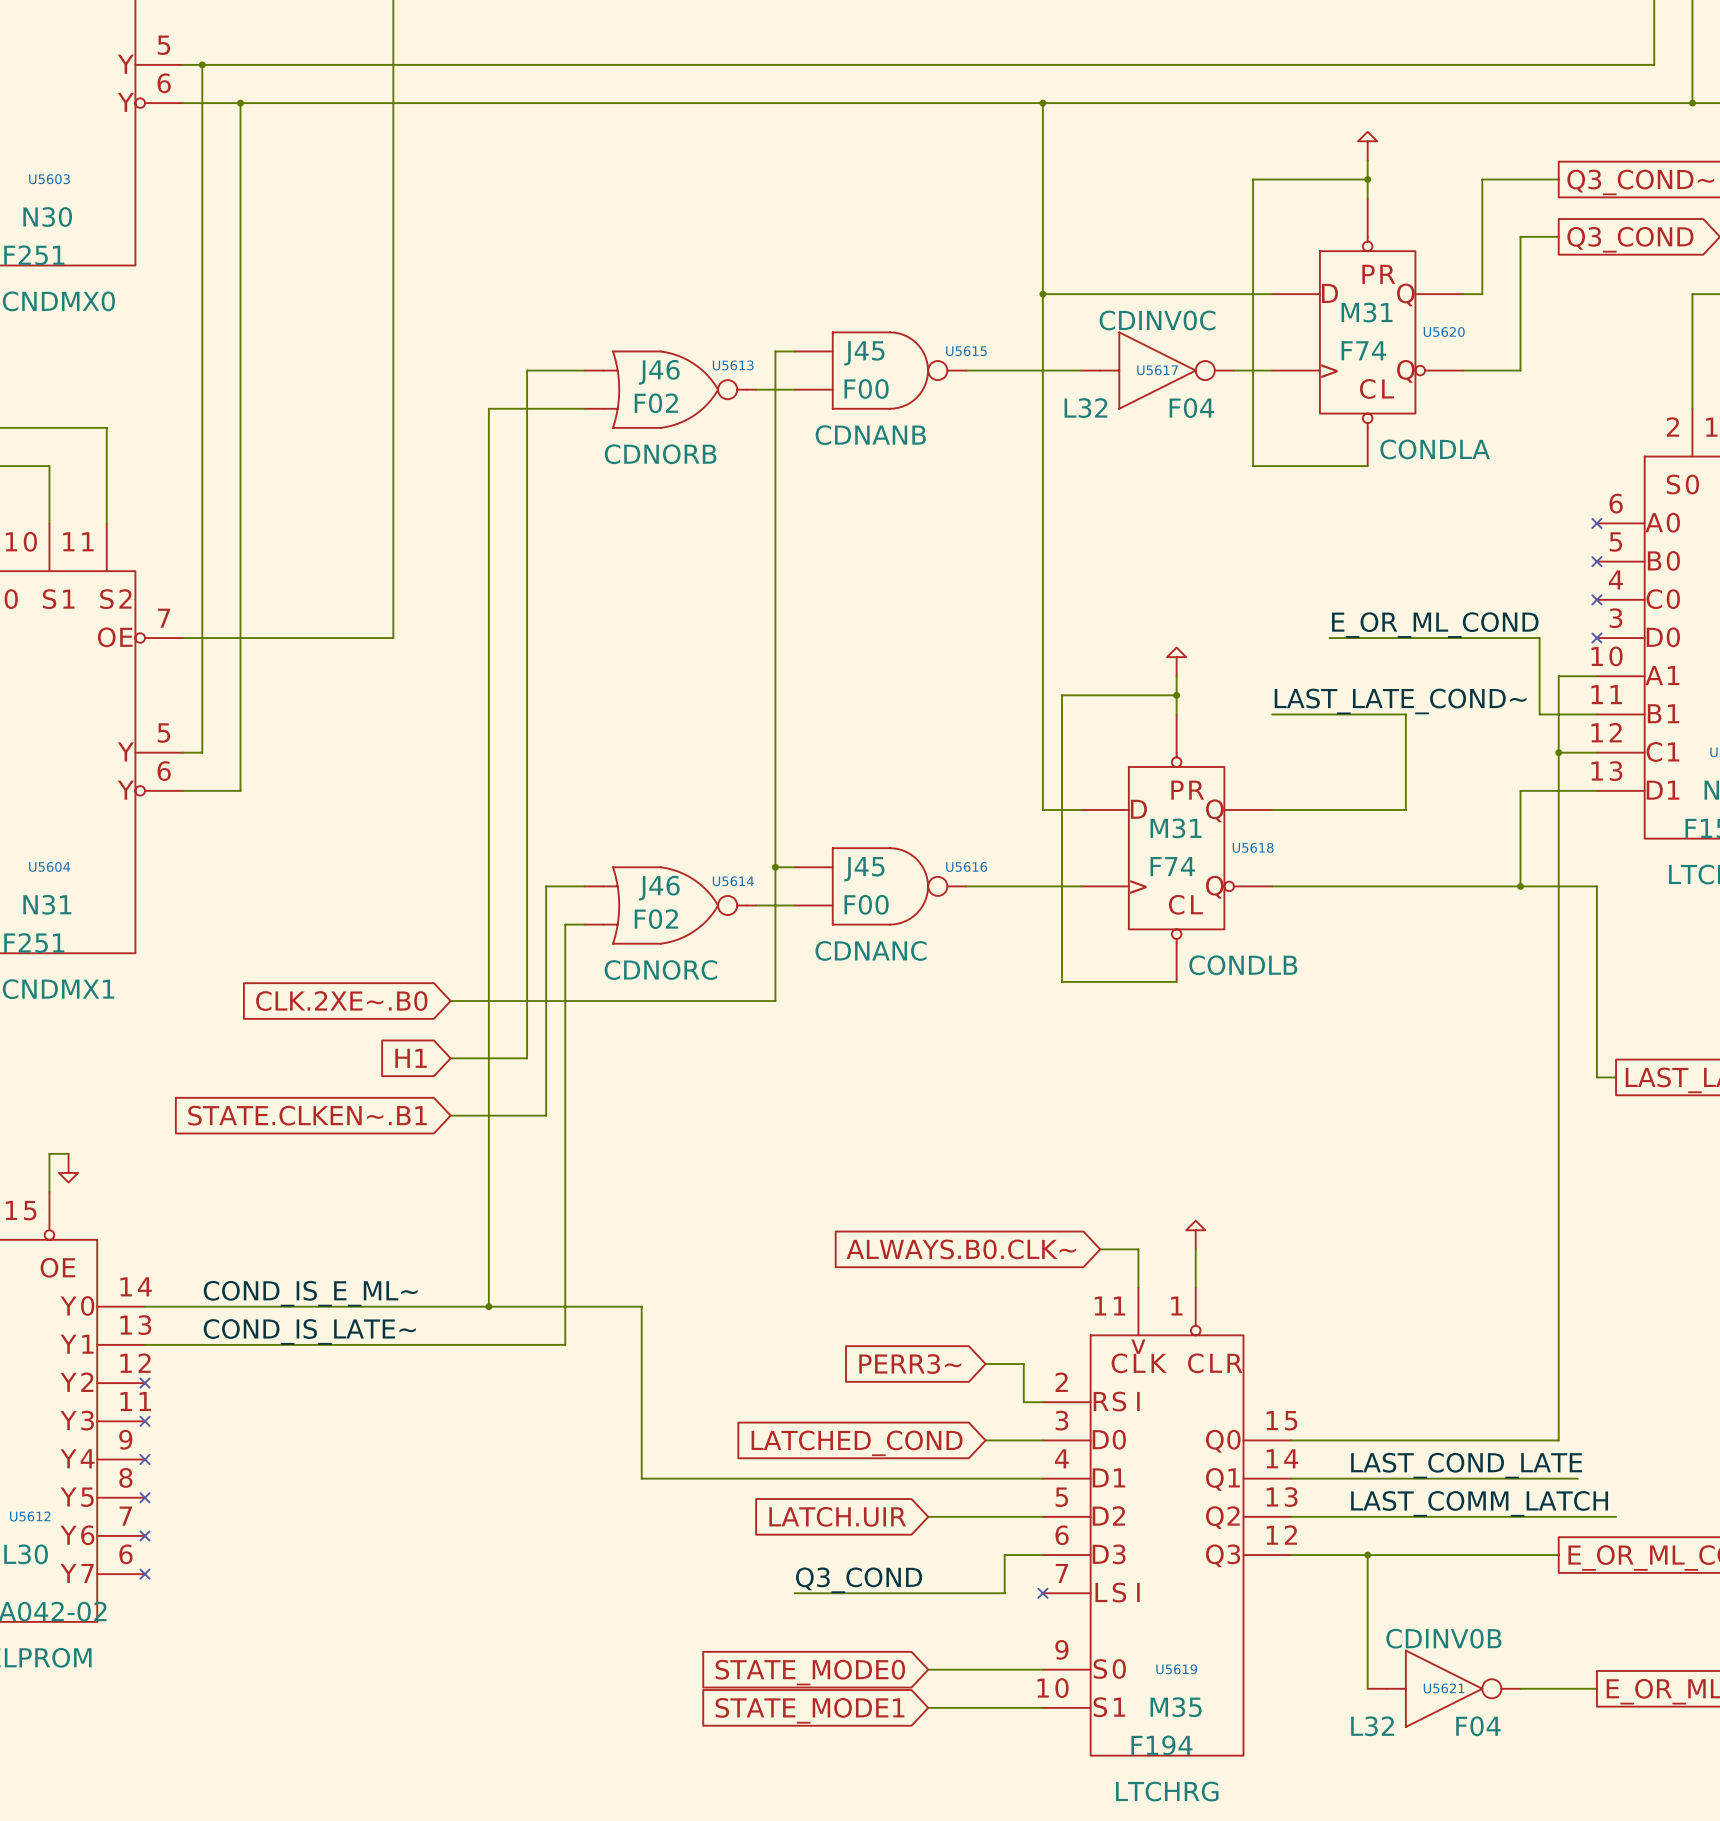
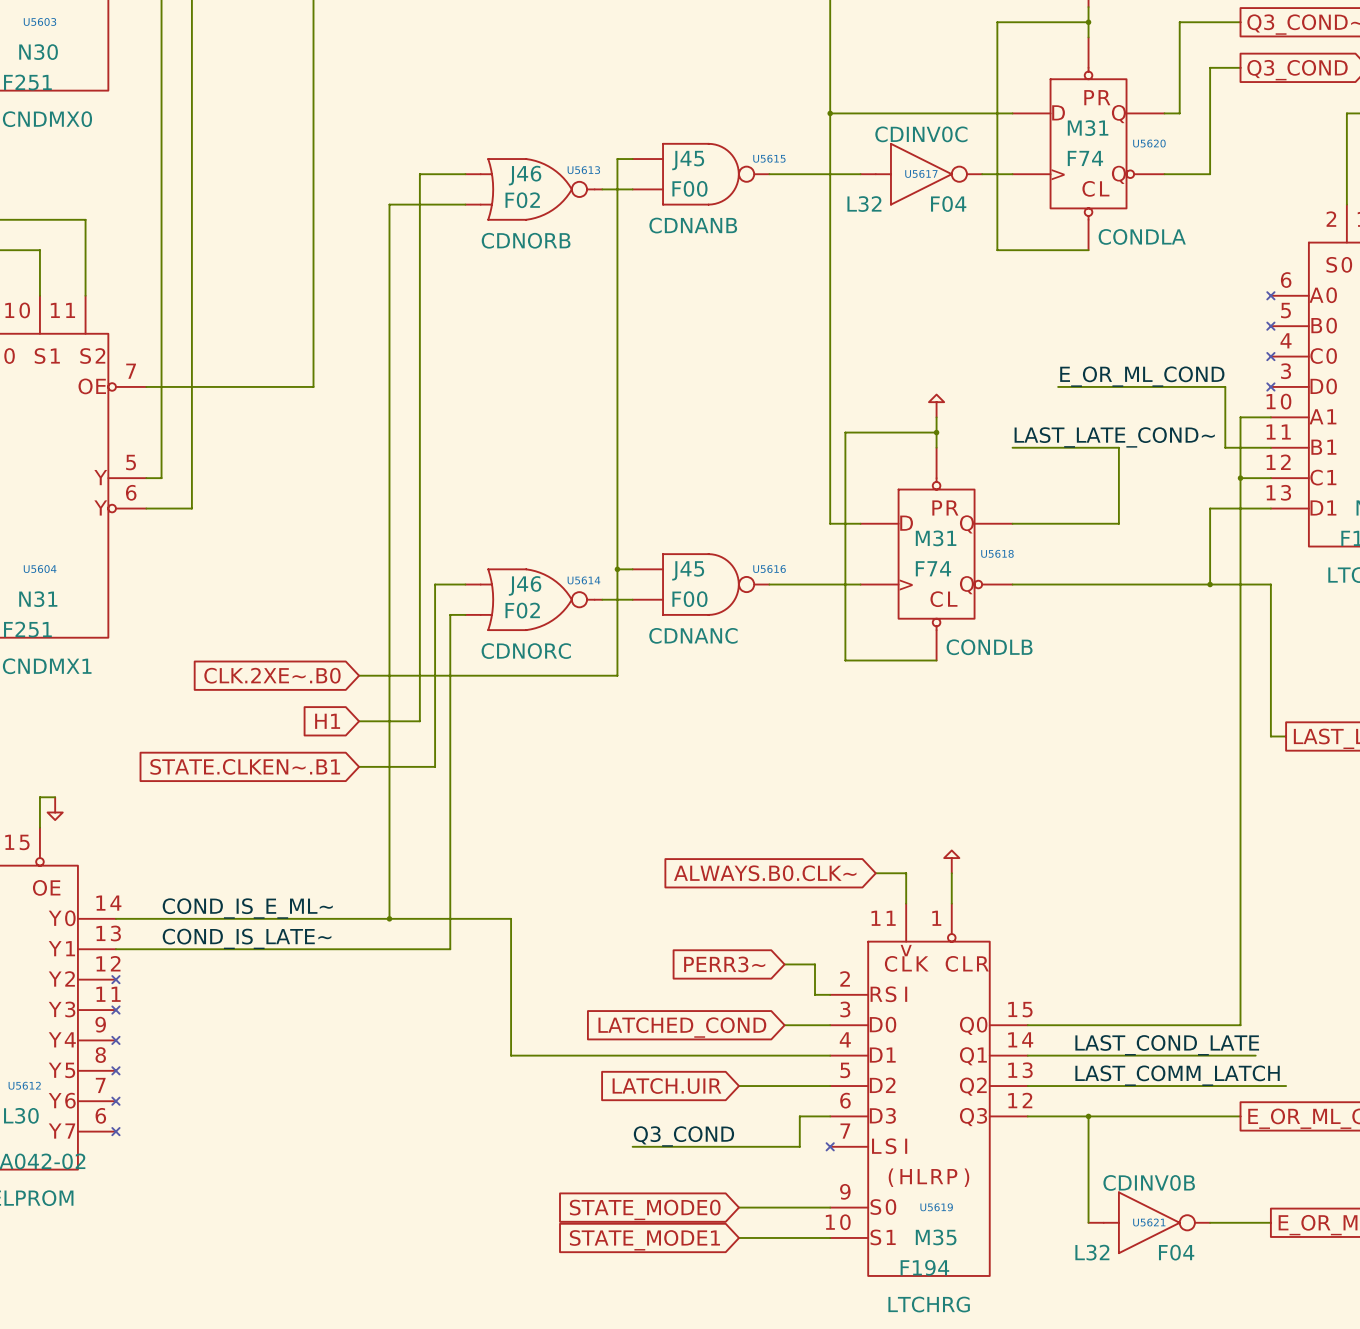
U5619 text: none -> H (906, 1176)
U5619 text: none -> L (922, 1176)
U5619 text: none -> R (937, 1176)
U5619 text: none -> P (952, 1176)
U5619 text: none -> ( (891, 1177)
U5619 text: none -> ) (966, 1177)

